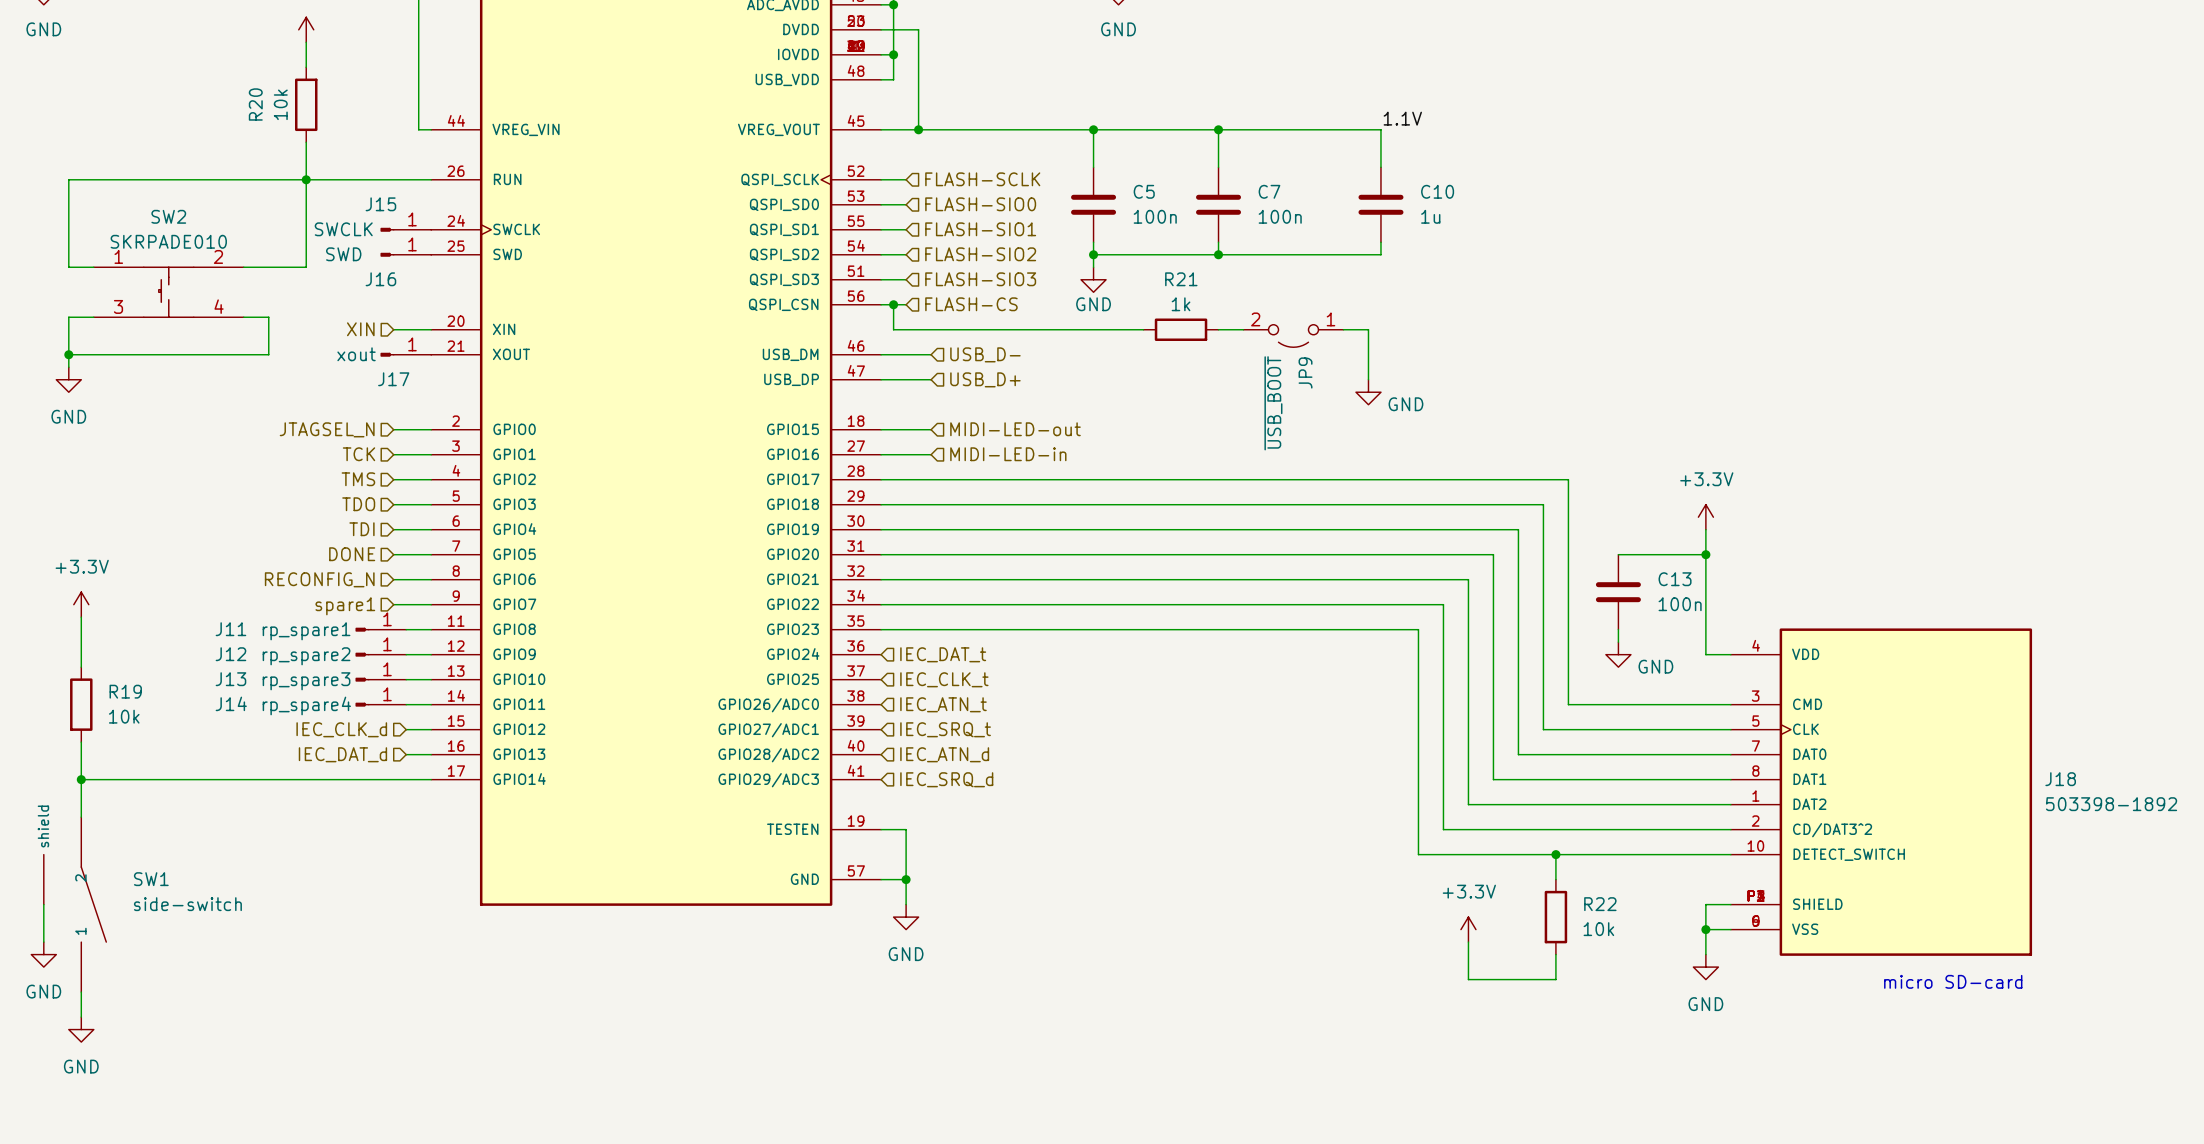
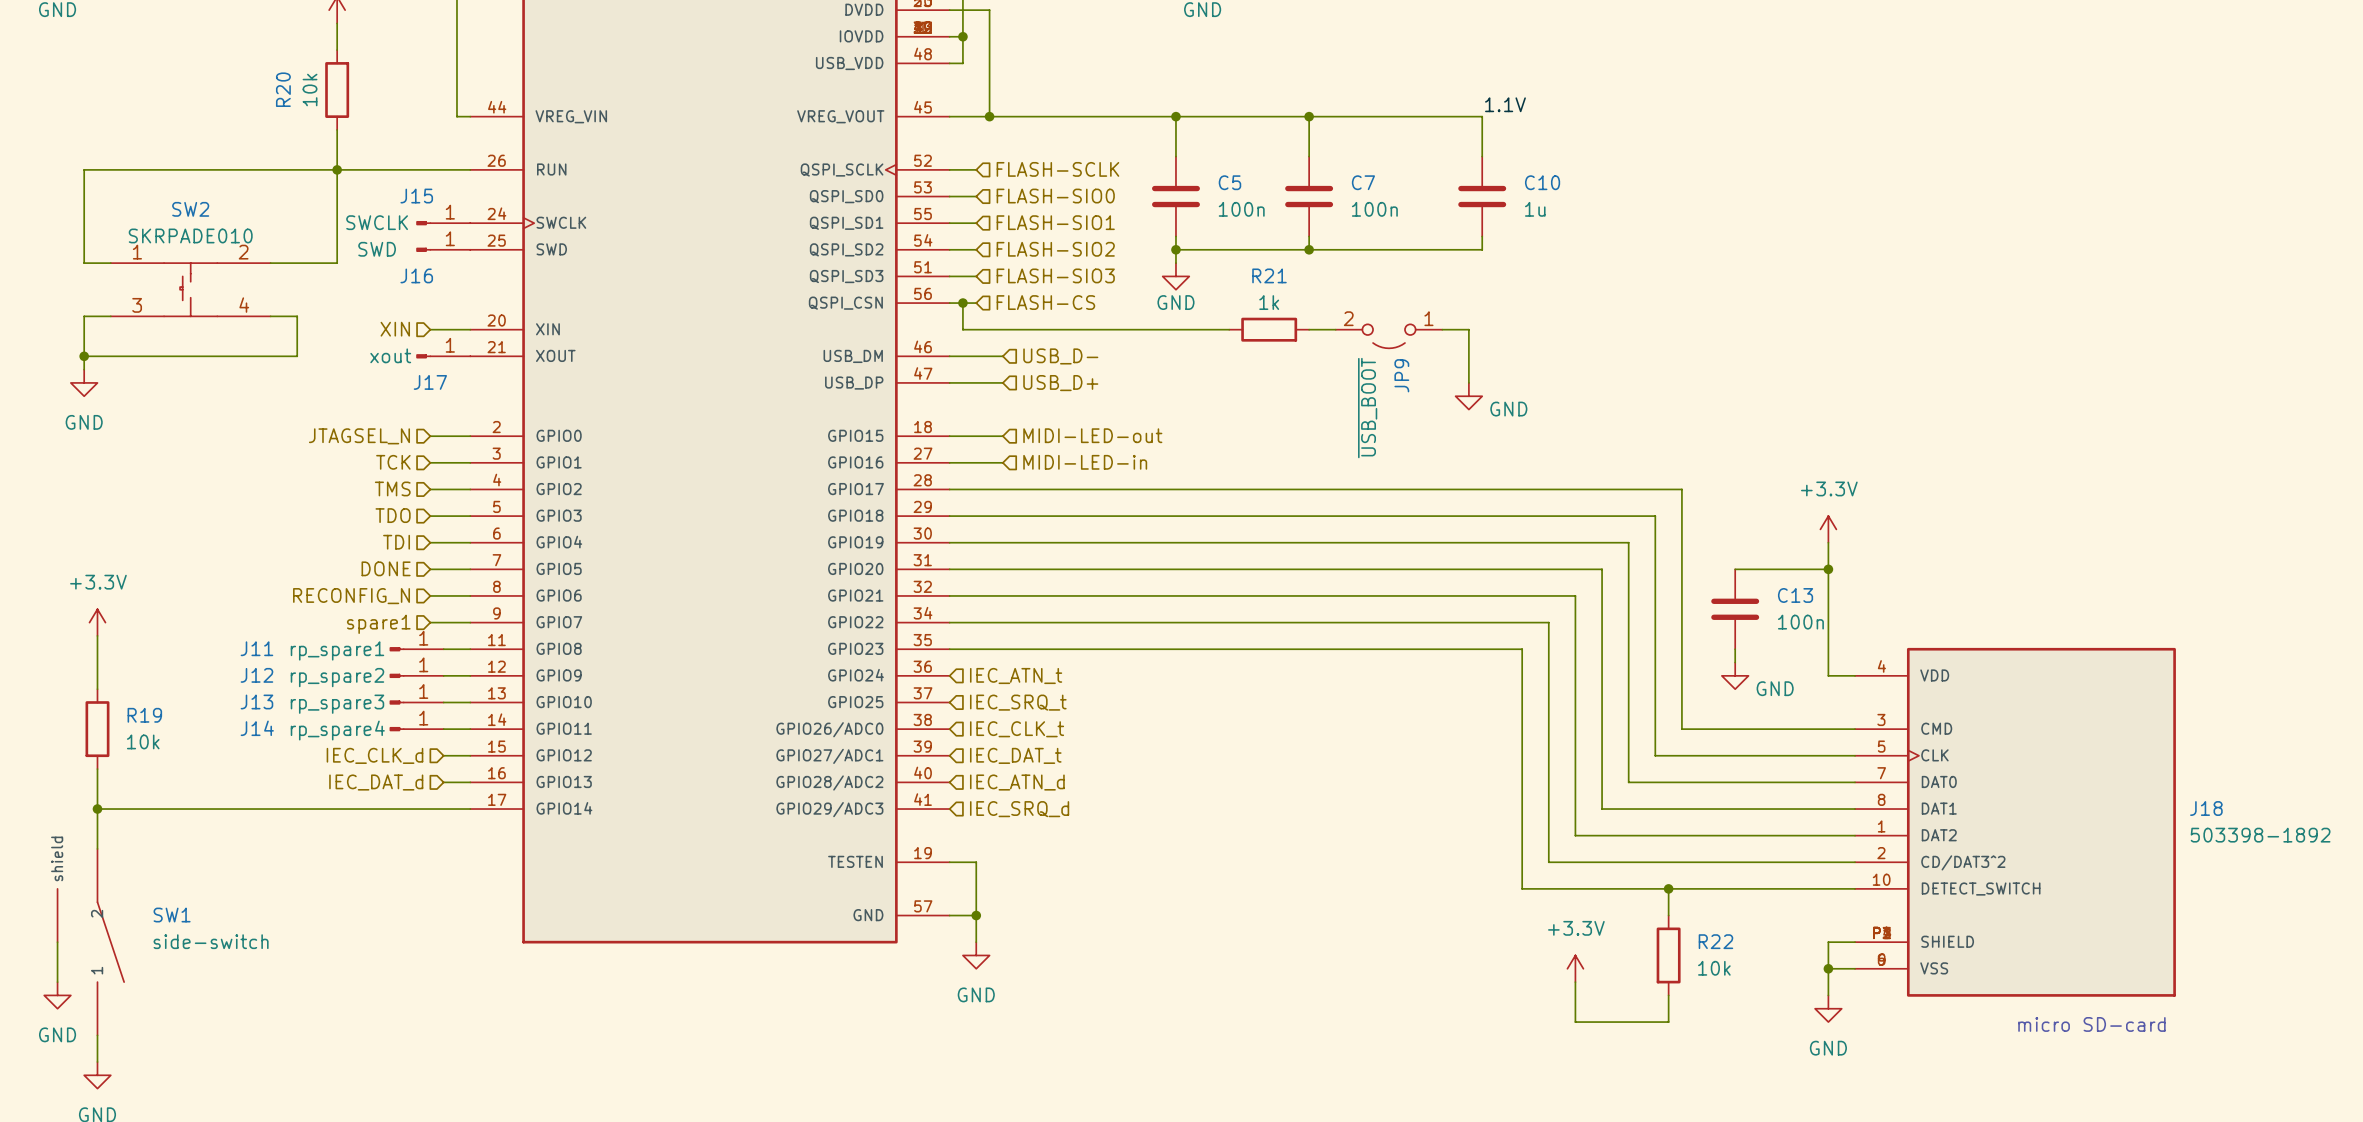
hierarchical label: IEC_DAT_t (943, 654) -> IEC_ATN_t (1016, 676)
hierarchical label: IEC_CLK_t (944, 679) -> IEC_SRQ_t (1018, 702)
hierarchical label: IEC_ATN_t (943, 704) -> IEC_CLK_t (1017, 729)
hierarchical label: IEC_SRQ_t (945, 729) -> IEC_DAT_t (1015, 755)

